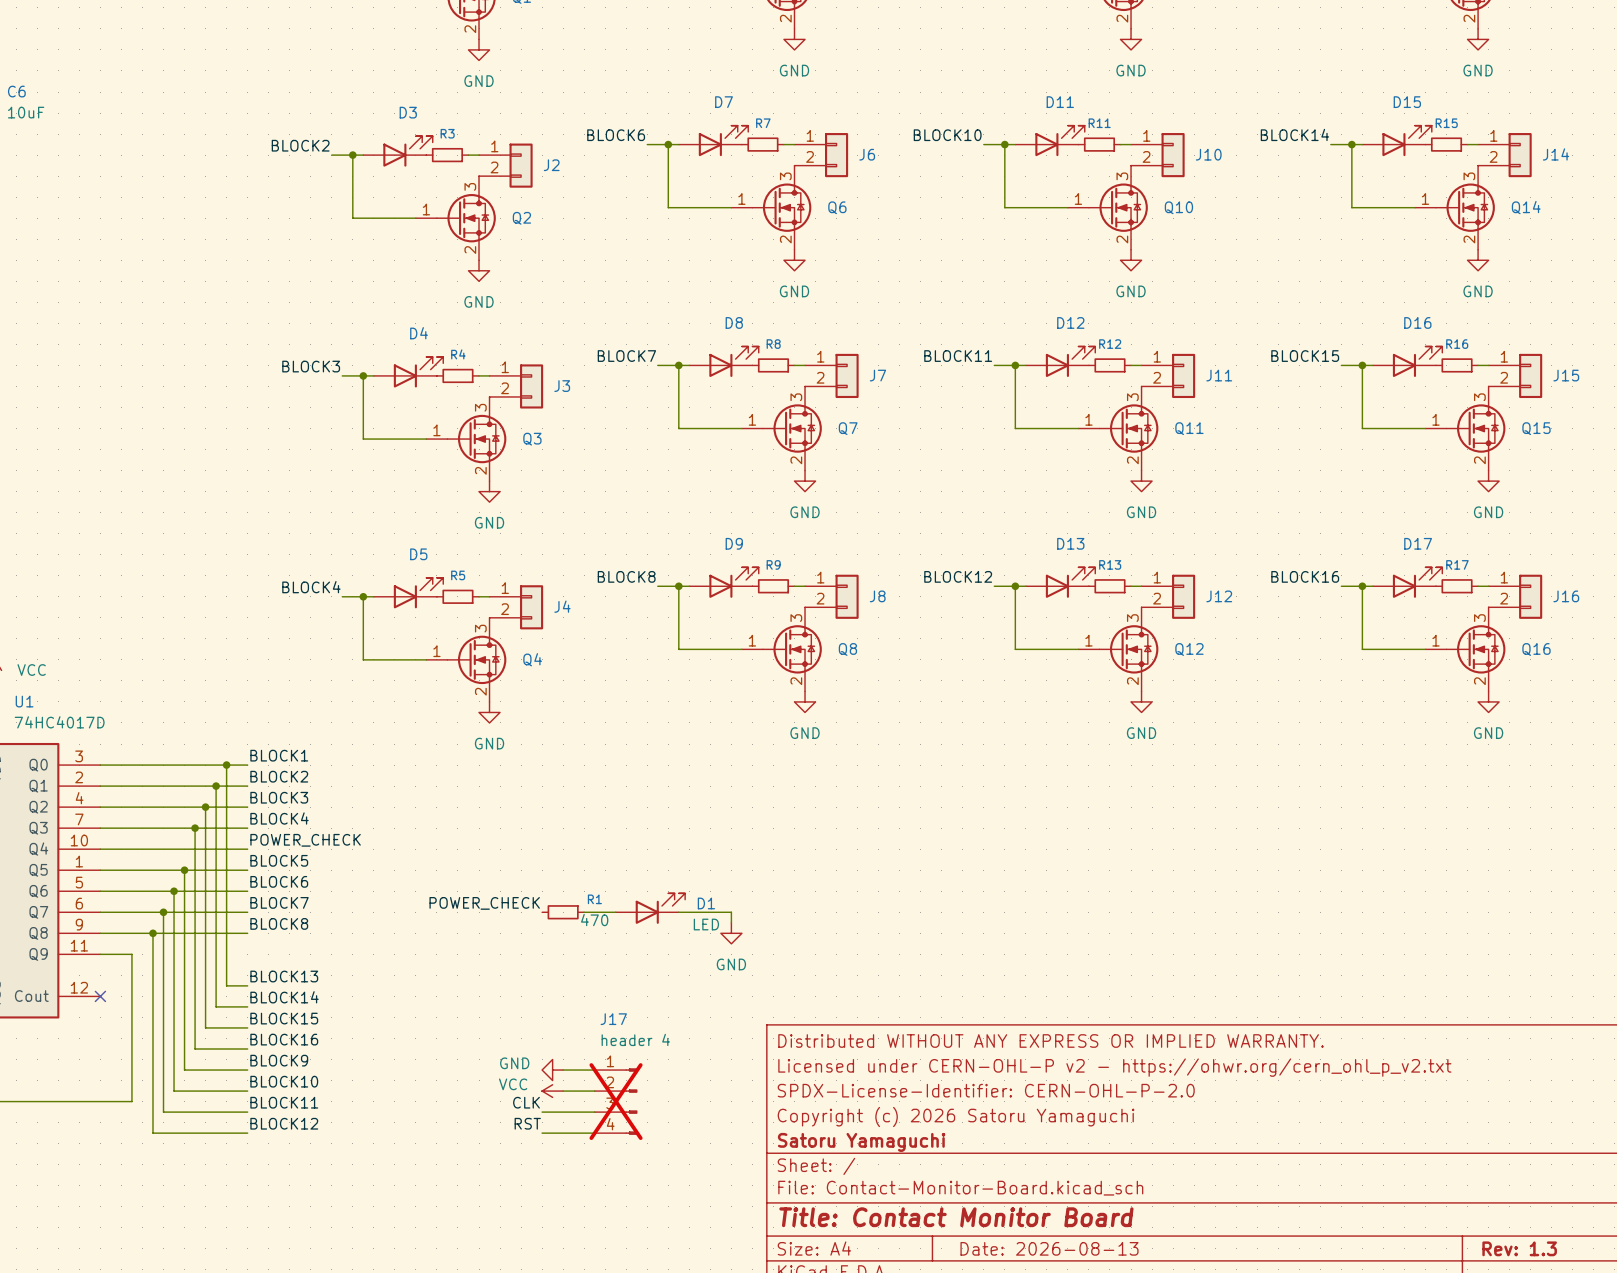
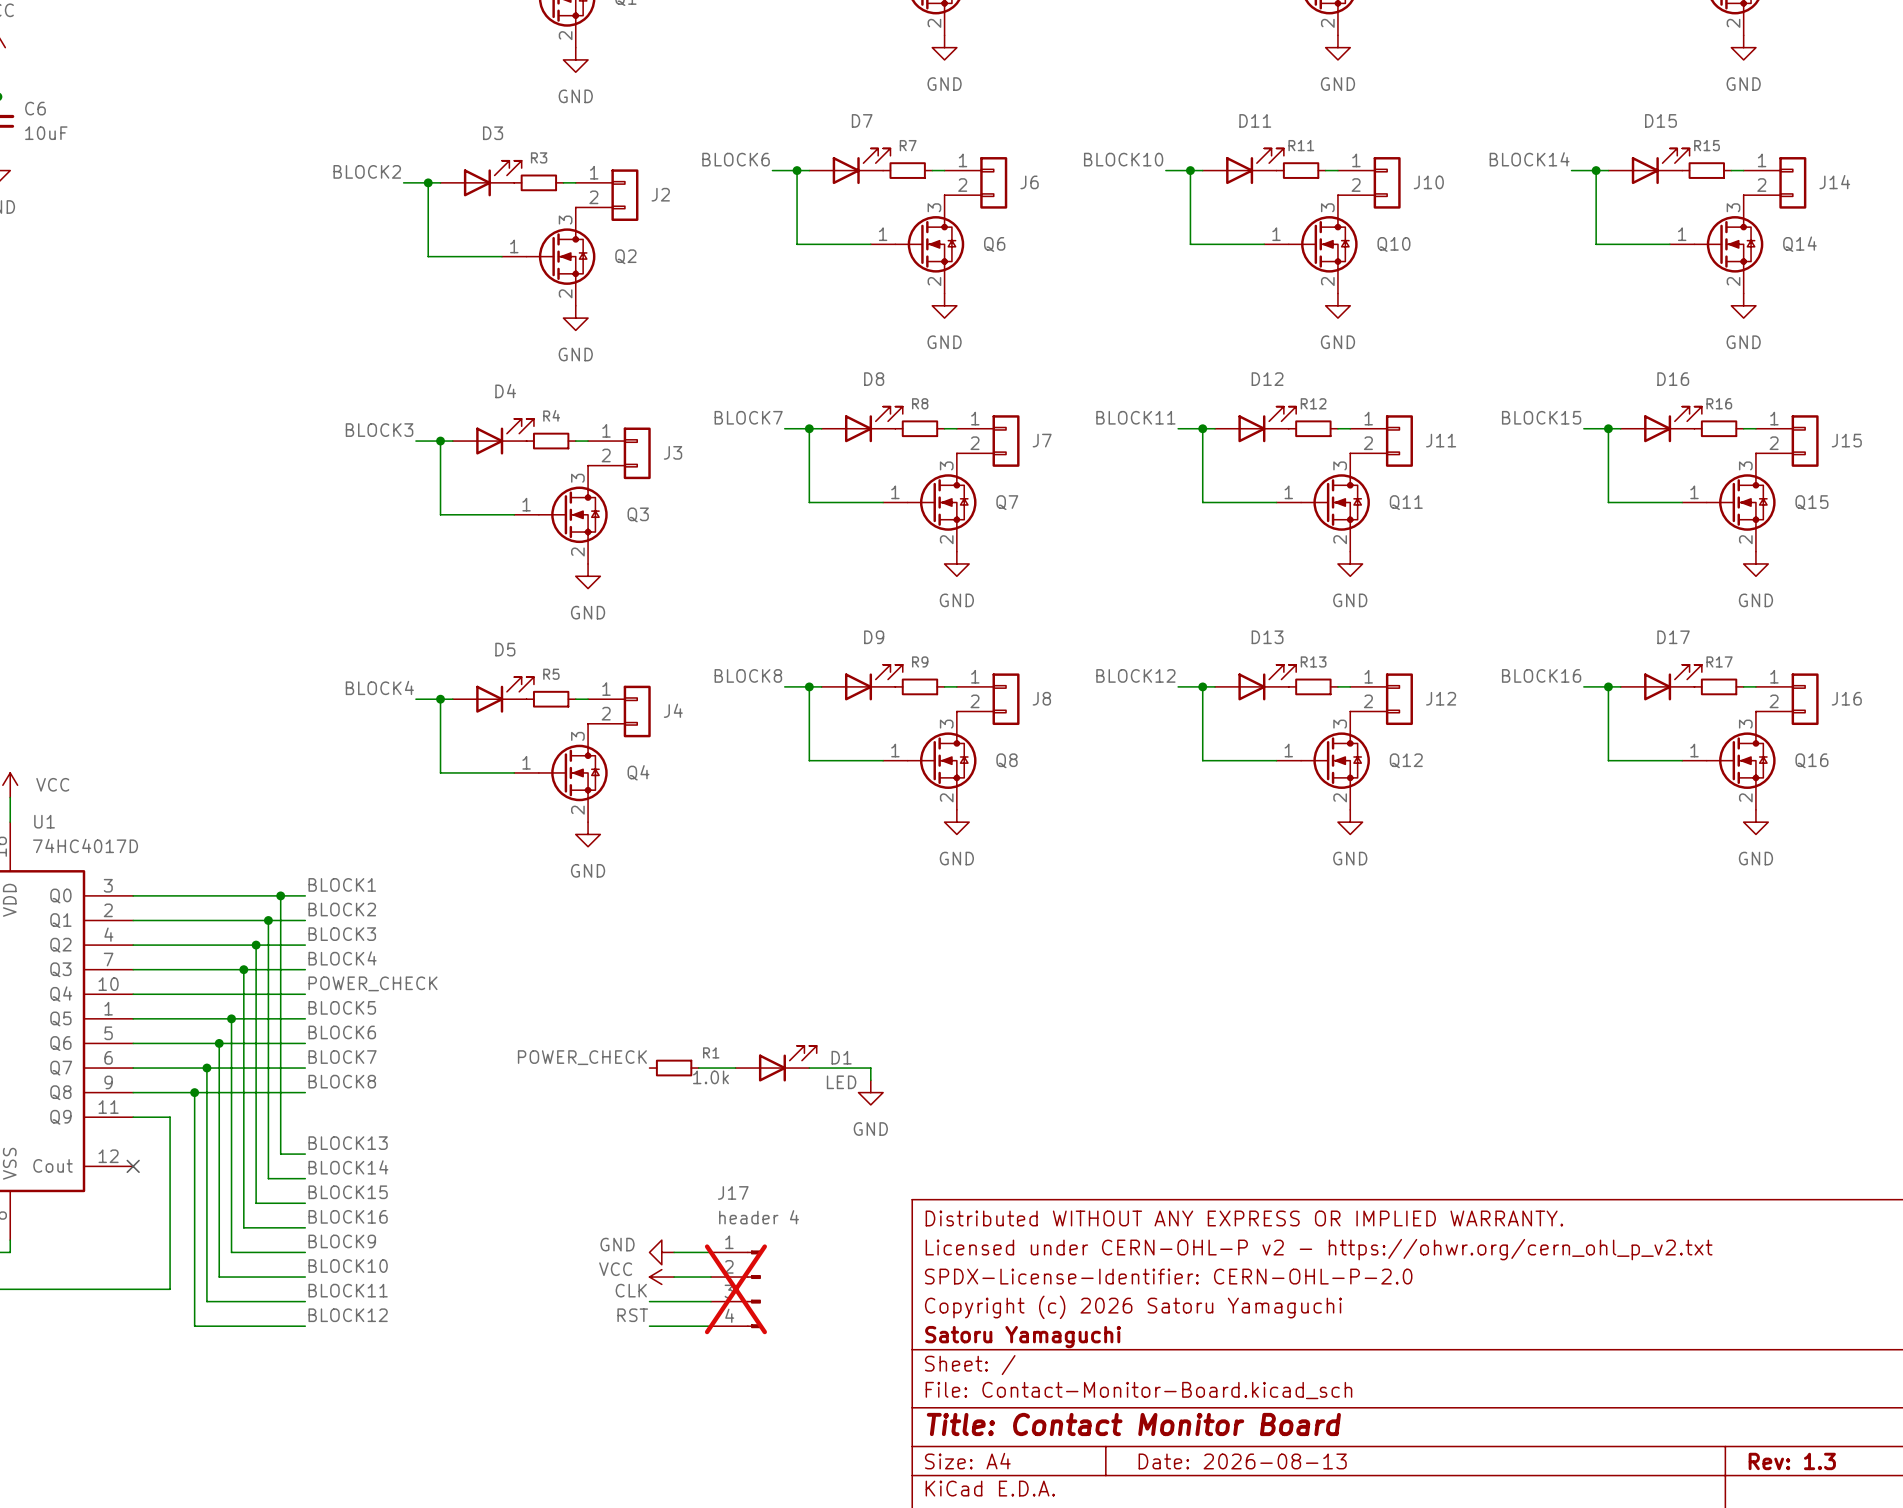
R1 value: 470 (594, 920) -> 1.0k (710, 1077)

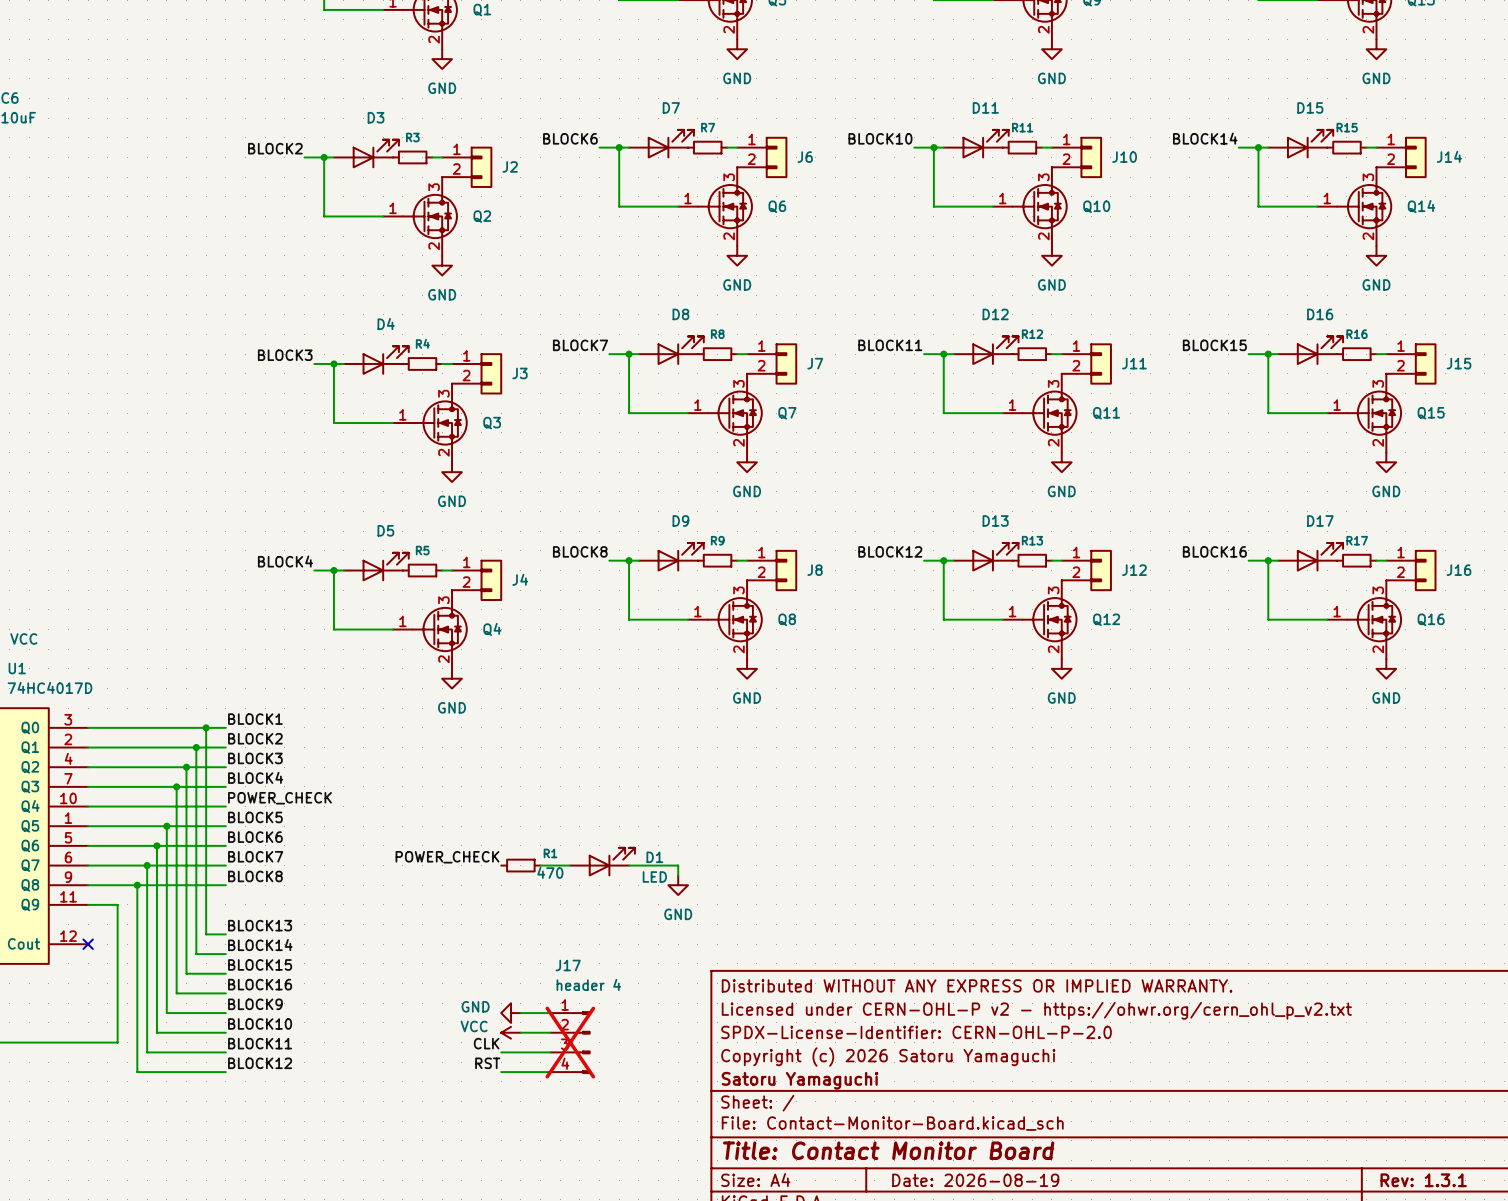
R1 value: 1.0k (710, 1077) -> 470 (550, 872)
title block: Date: 2026-08-13 (1242, 1461) -> Date: 2026-08-19 (975, 1180)
title block: Rev: 1.3 (1792, 1461) -> Rev: 1.3.1 (1423, 1180)

